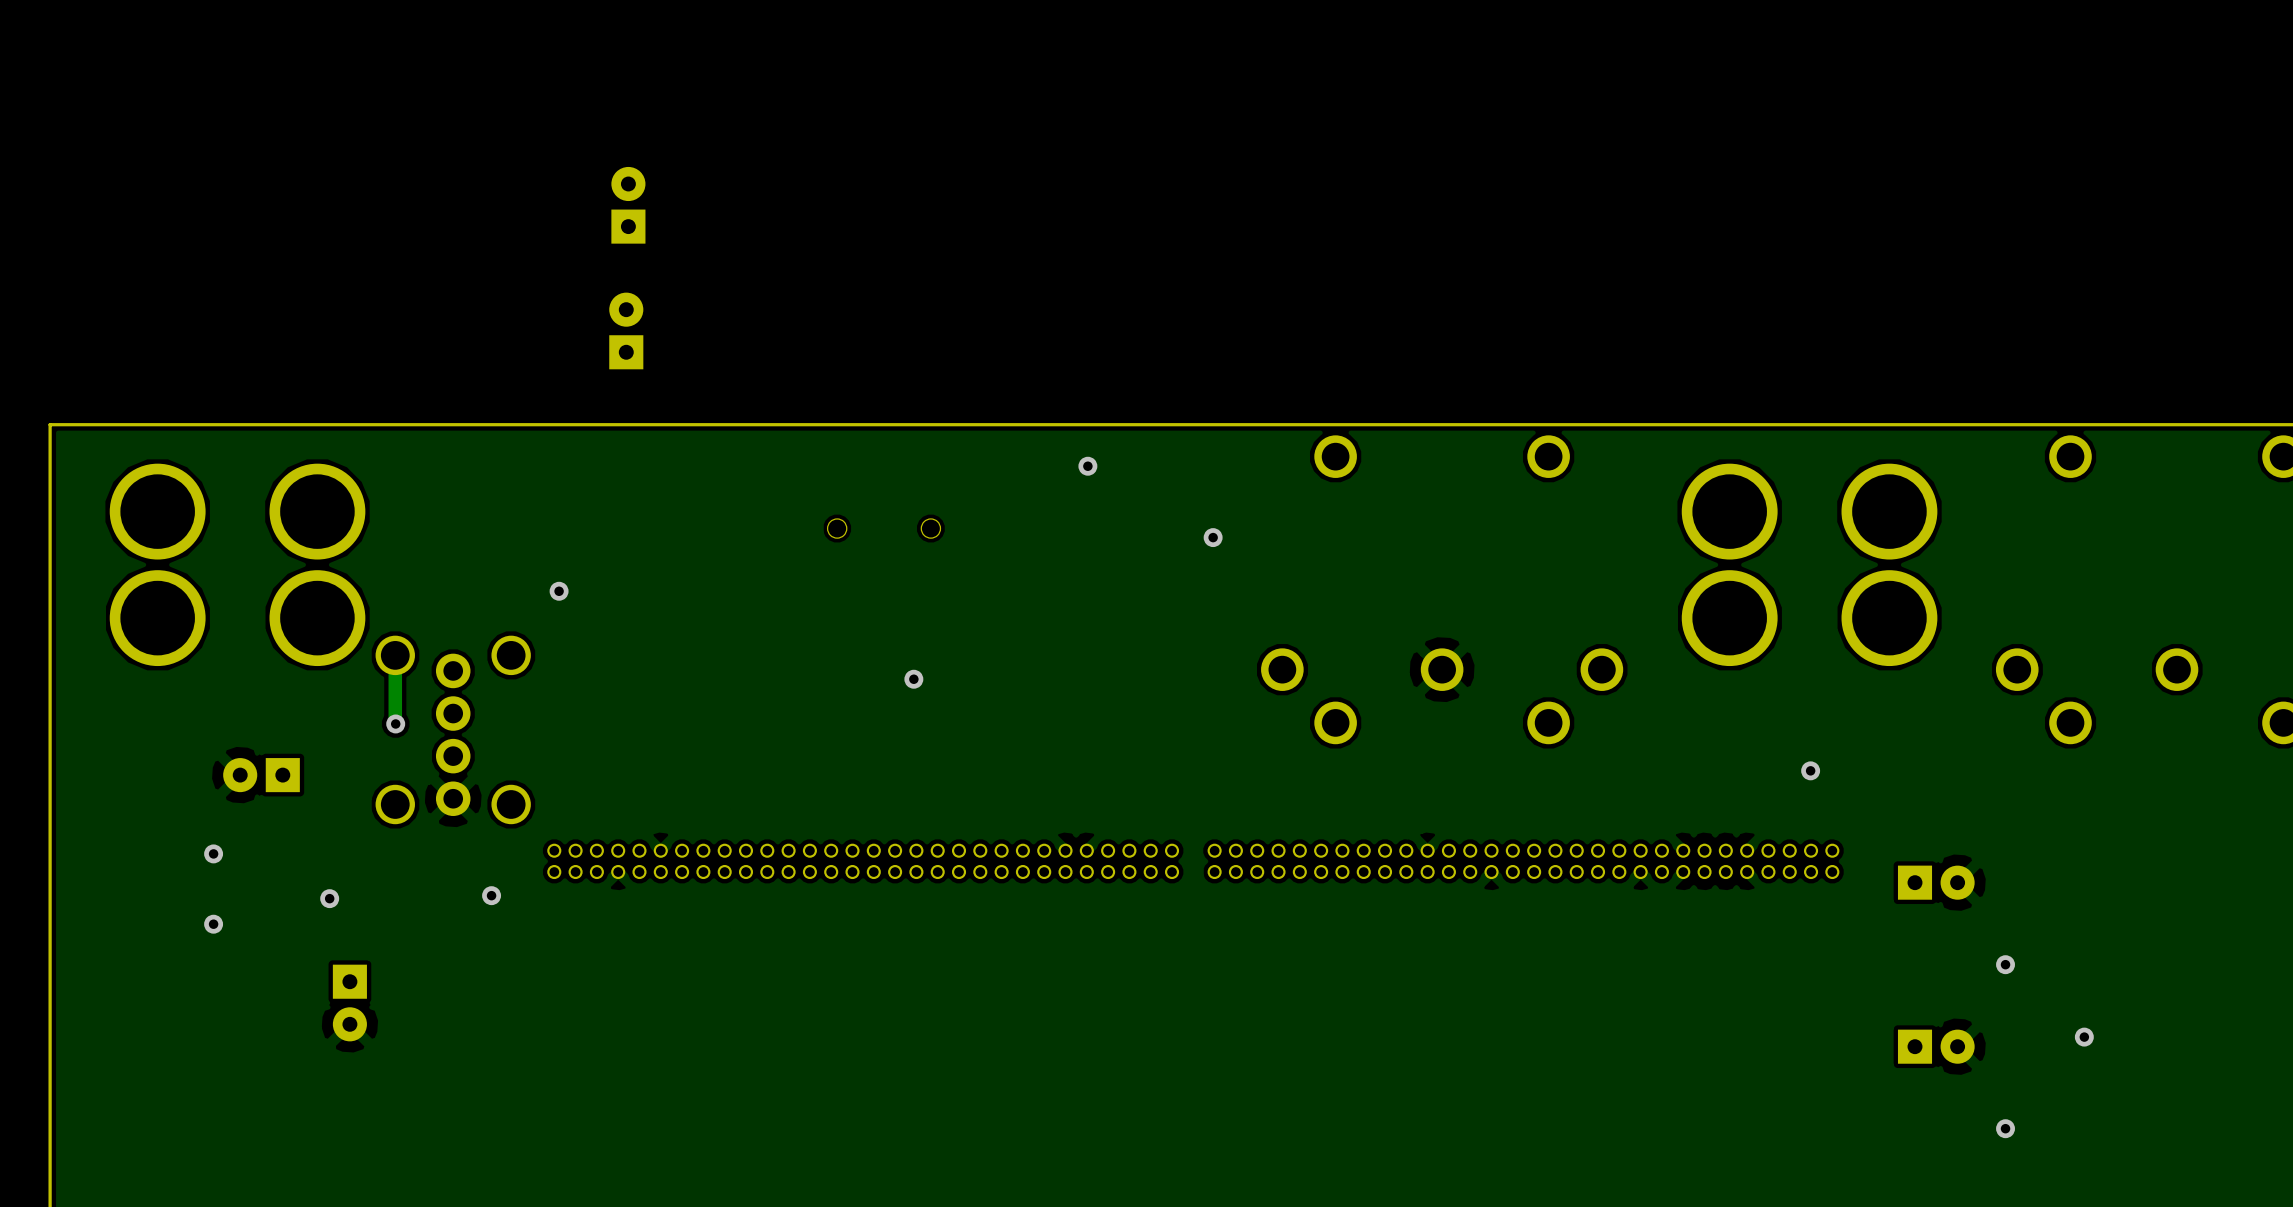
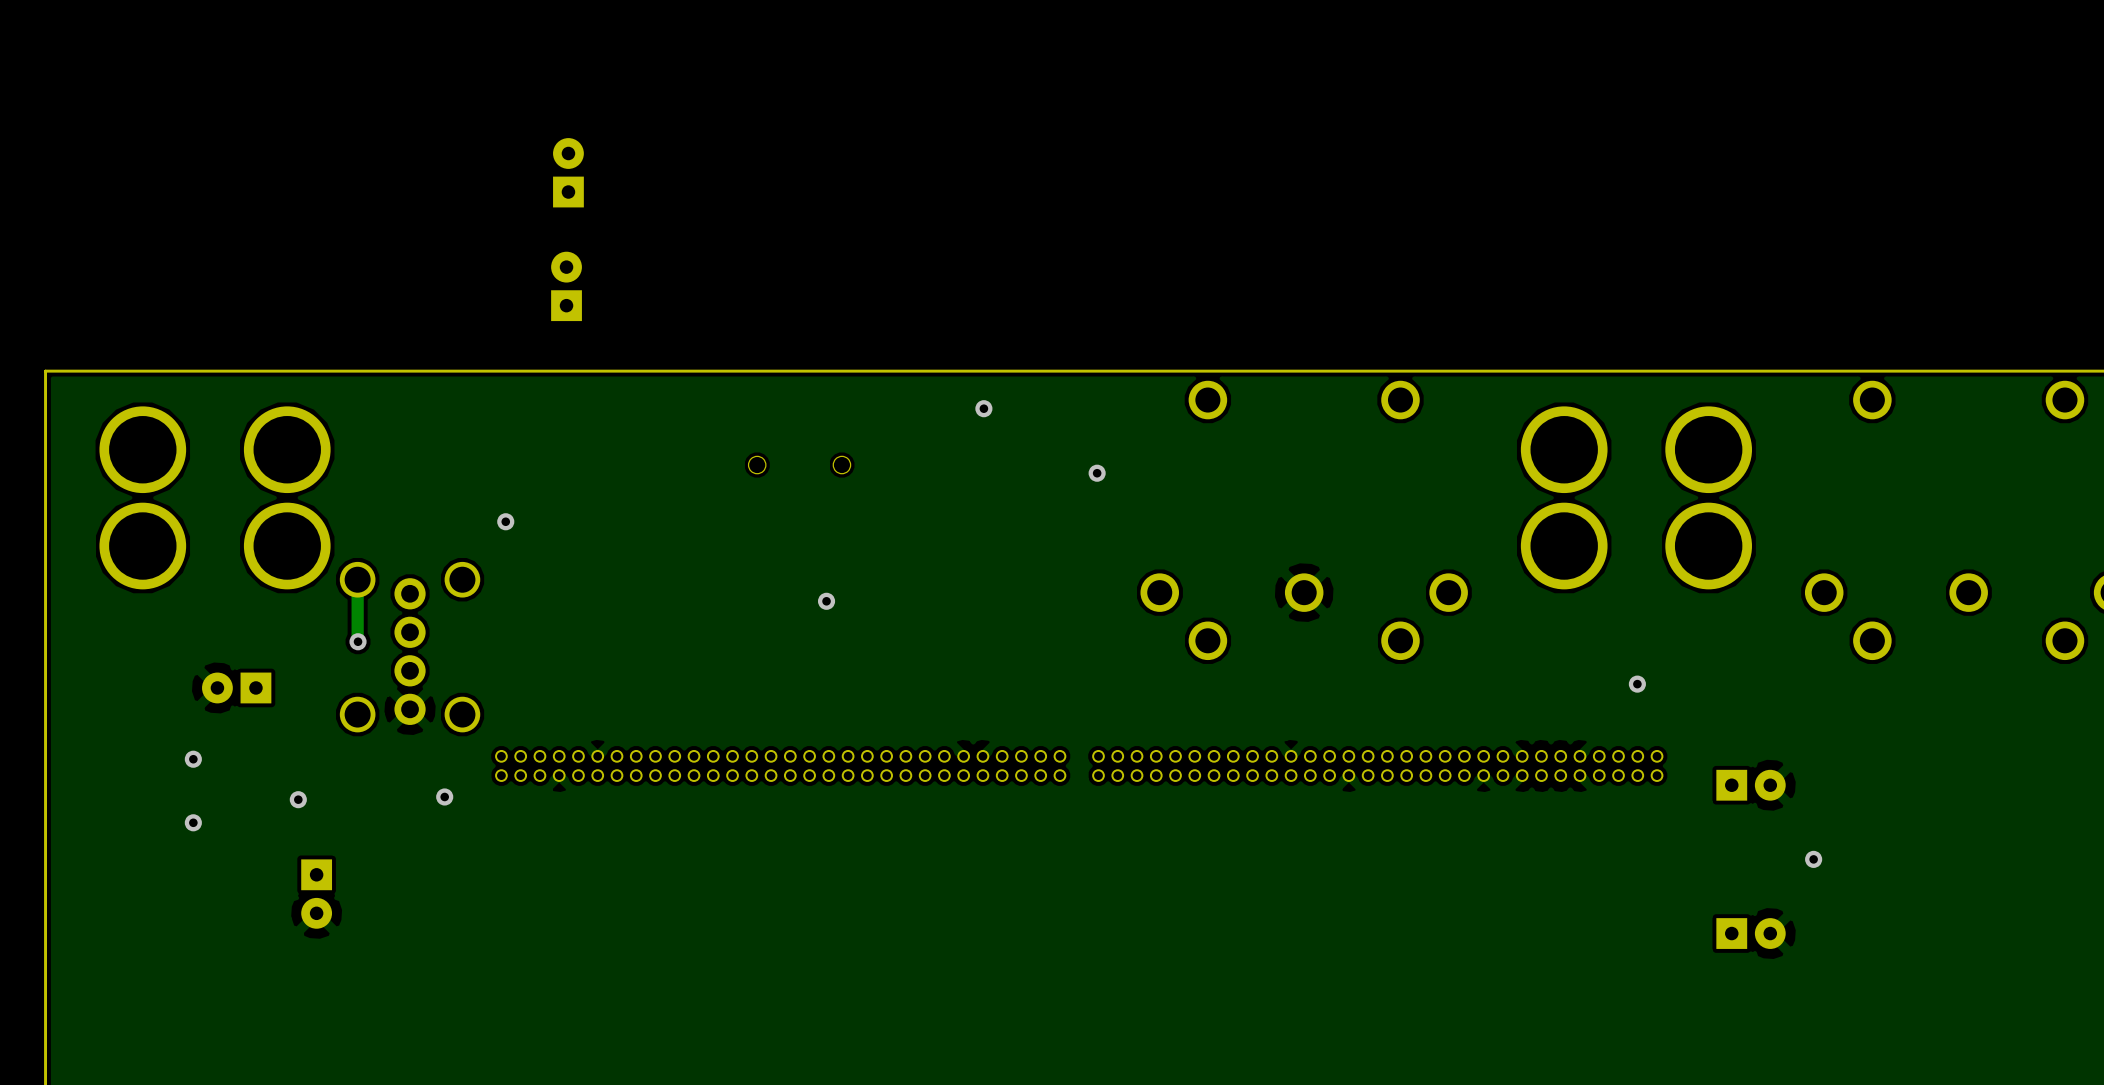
via: (2084, 1037) -> none
via: (2005, 1128) -> none

